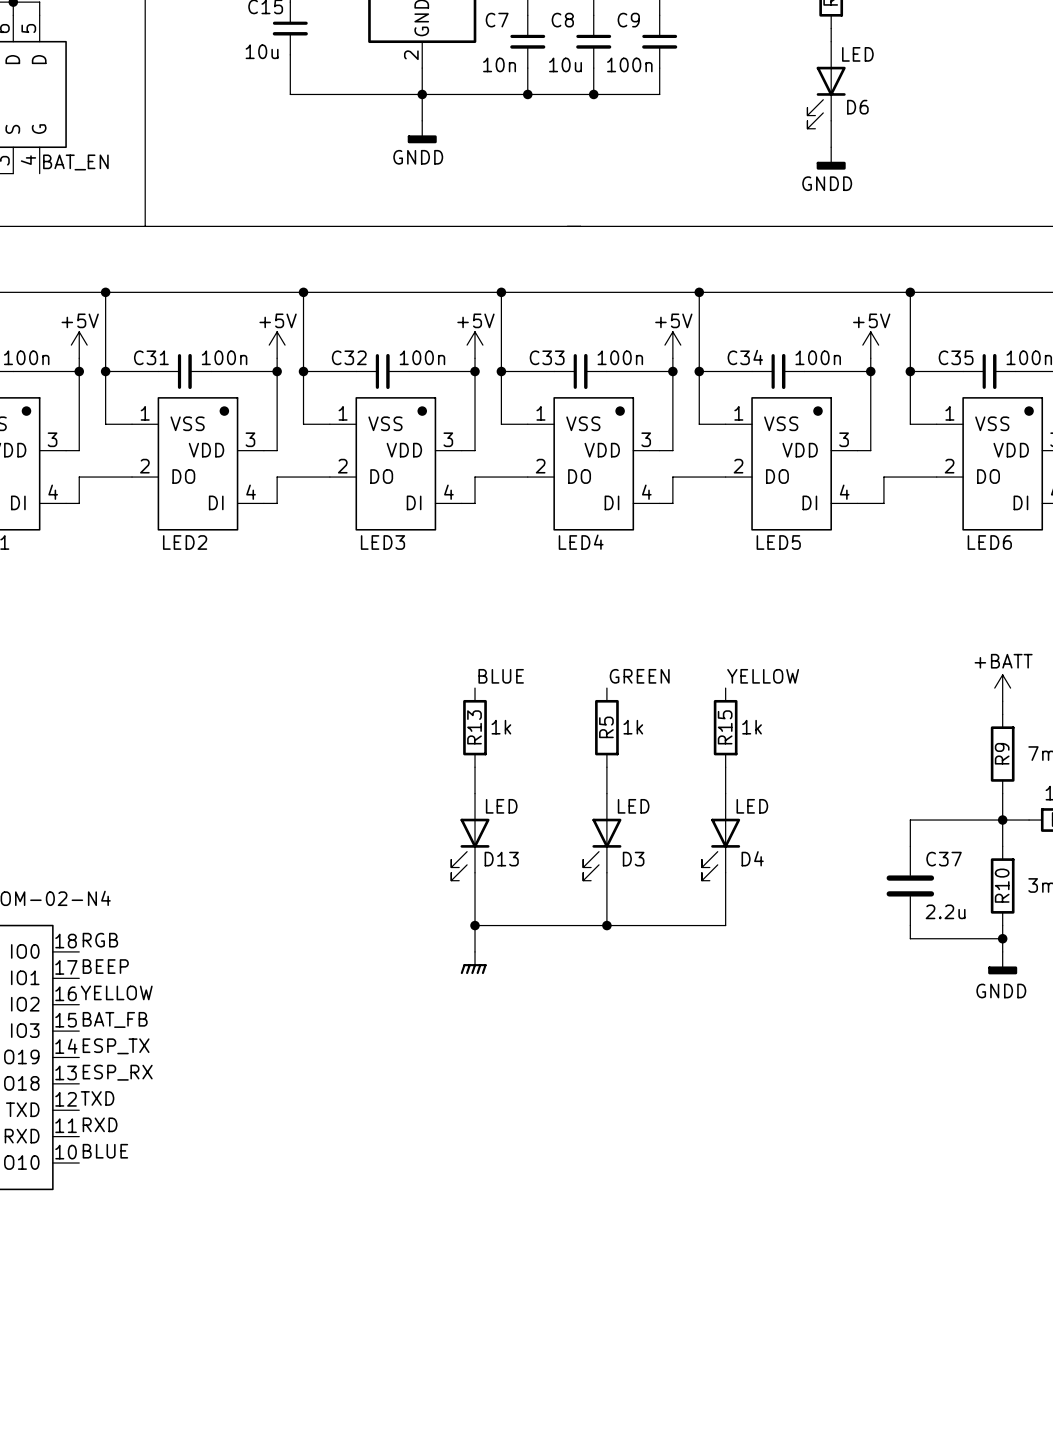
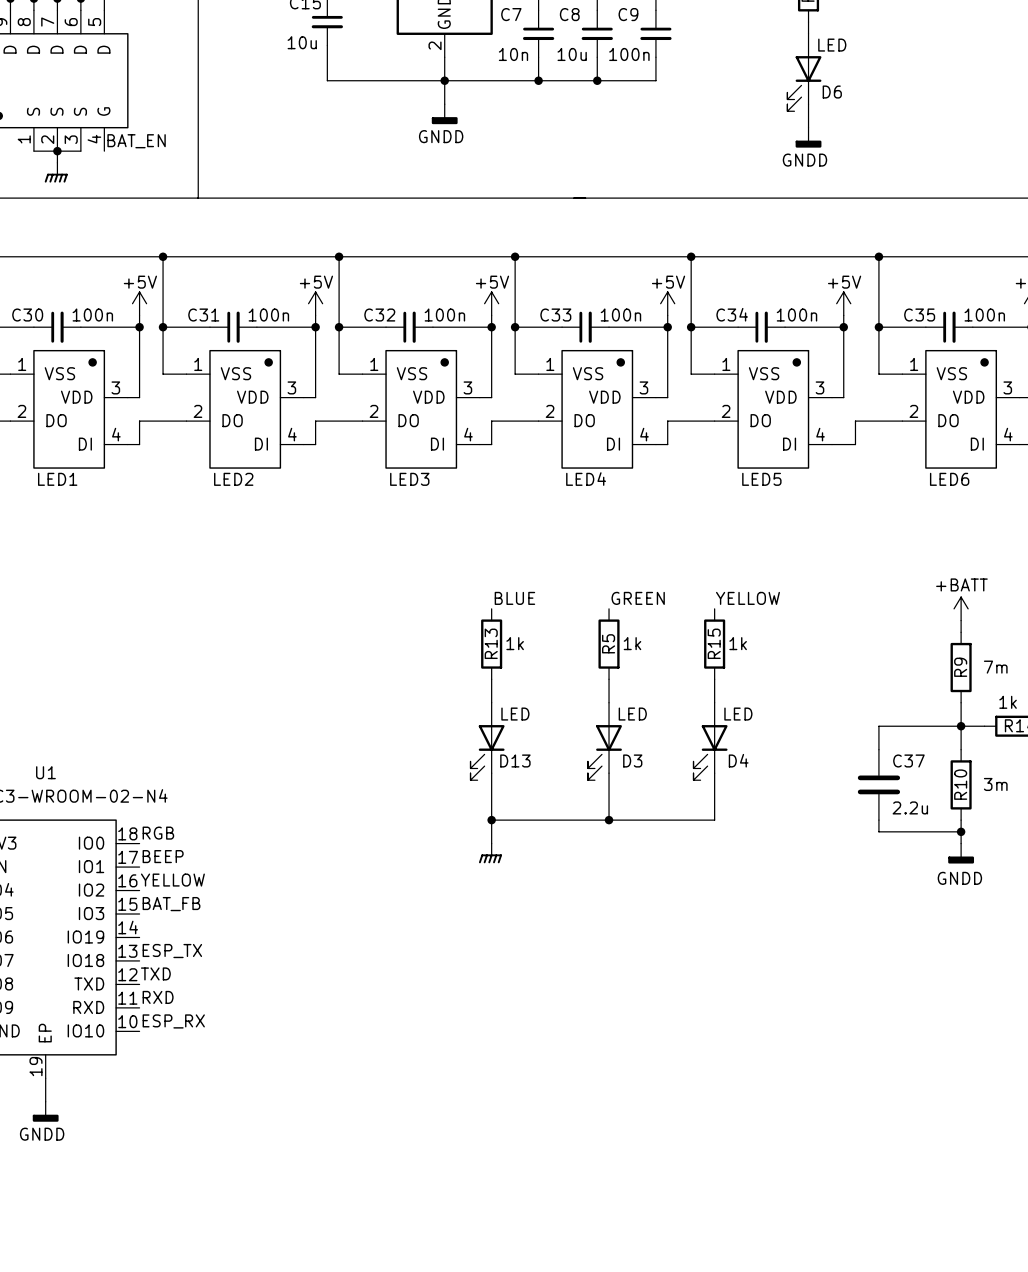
label: ESP_TX (116, 1046) -> none
label: ESP_RX (117, 1072) -> ESP_TX (172, 951)
label: BLUE (105, 1151) -> ESP_RX (173, 1021)

